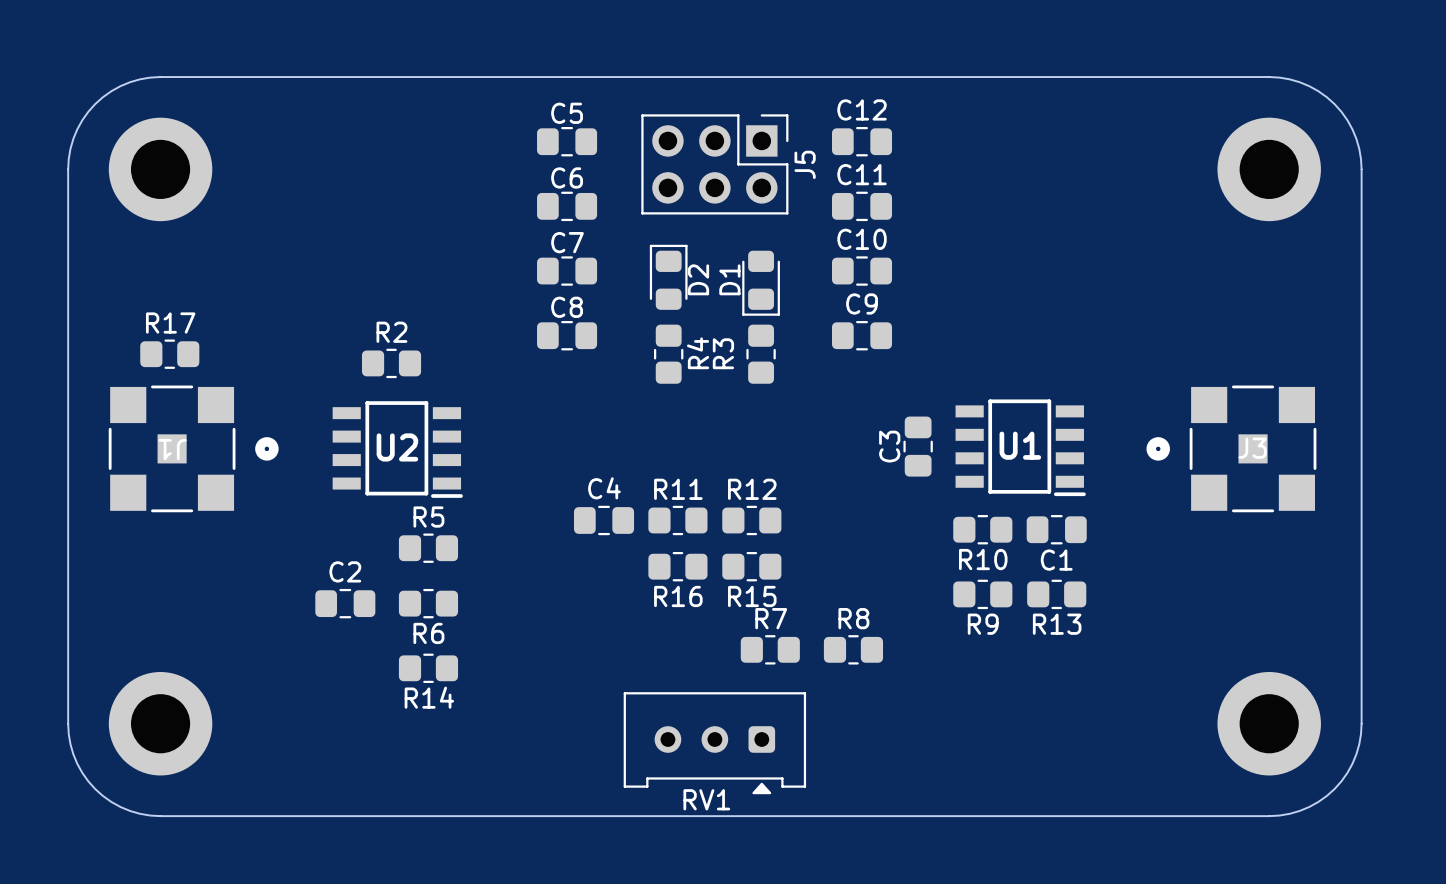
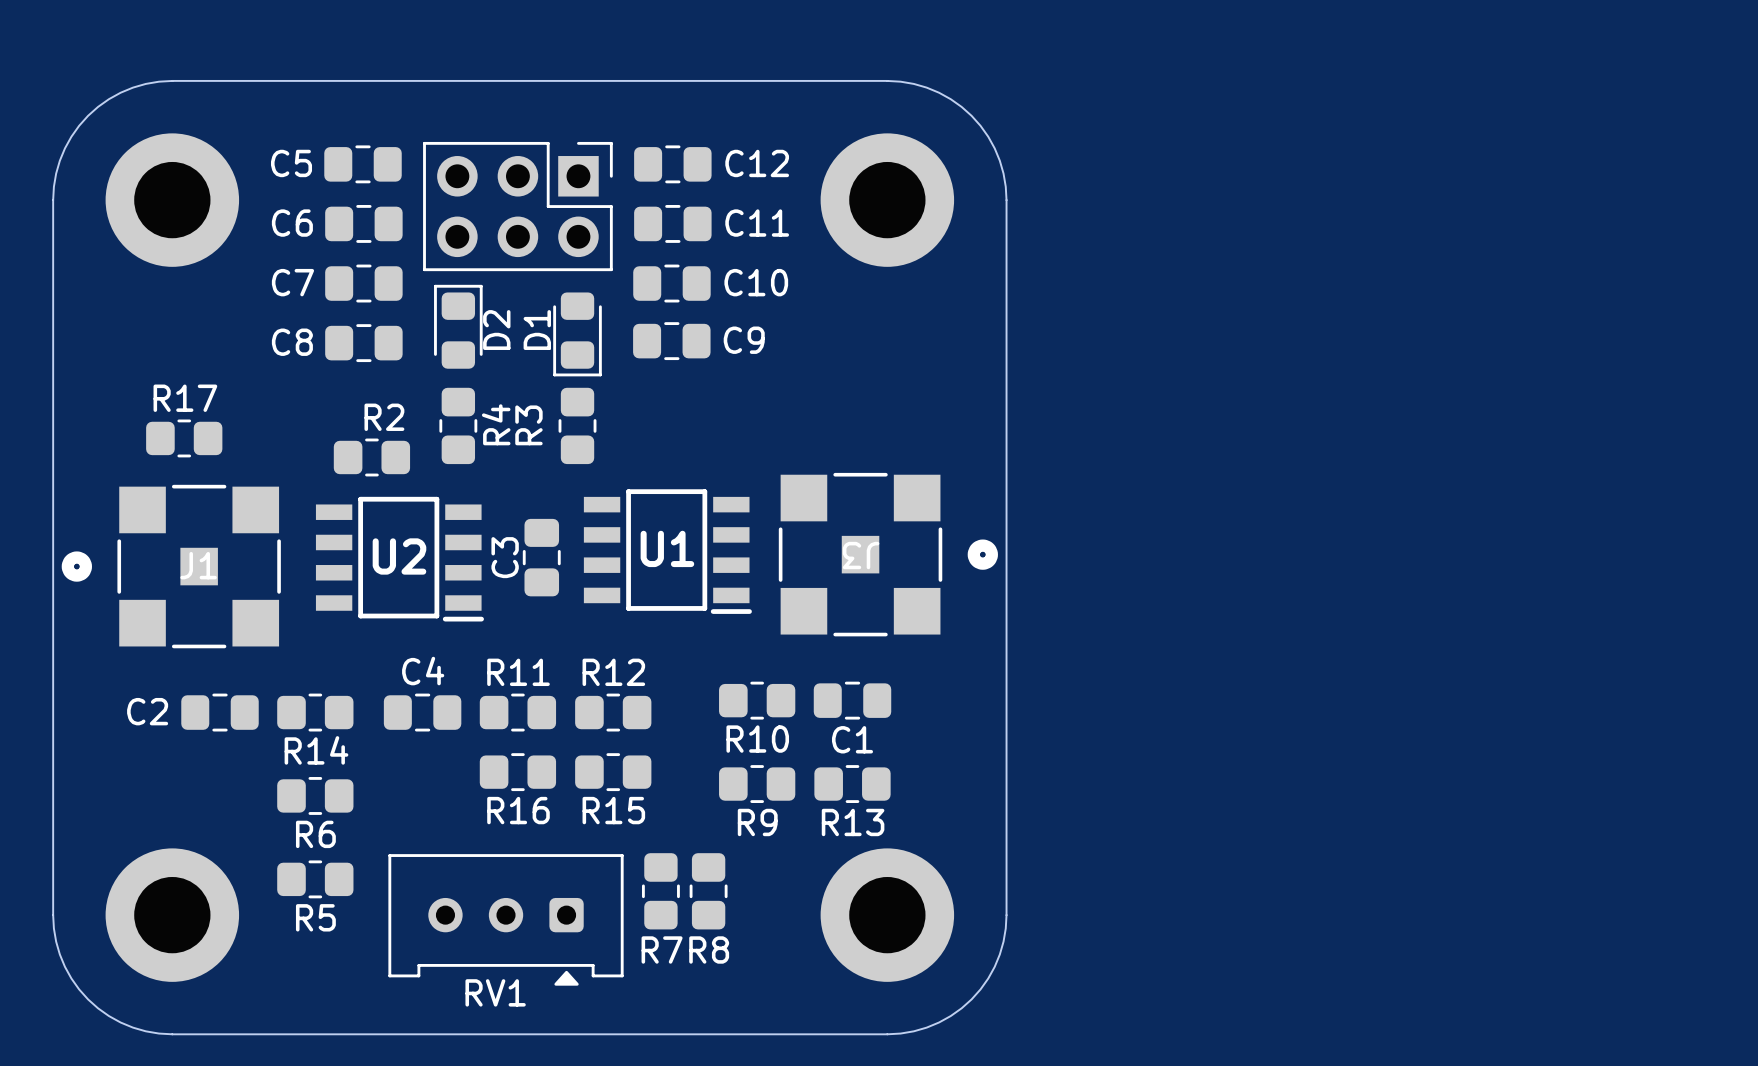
board edge: (714, 77) (1279, 77) (1309, 86) (1326, 97) (1341, 111) (1356, 138) (1361, 169) (1361, 723) (1356, 754) (1347, 772) (1334, 789) (1318, 801) (1299, 810) (1269, 816) (714, 816) -> (887, 80) (926, 87) (950, 99) (971, 115) (988, 136) (999, 160) (1006, 200) (1005, 928) (994, 966) (971, 999) (939, 1022) (913, 1031) (887, 1034)
C12 name position: C12 (862, 109) -> C12 (757, 163)
C5 name position: C5 (567, 113) -> C5 (291, 163)
C5 position: (567, 141) -> (363, 164)
C12 position: (862, 141) -> (672, 164)
J5: (714, 164) -> none
part: none -> (887, 200)
part: (1269, 169) -> none
part: none -> (517, 206)
C11 name position: C11 (862, 174) -> C11 (757, 223)
C6 name position: C6 (567, 177) -> C6 (292, 223)
C6 position: (567, 206) -> (363, 223)
C11 position: (862, 206) -> (672, 223)
C10 name position: C10 (862, 239) -> C10 (756, 282)
C7 name position: C7 (567, 242) -> C7 (292, 282)
C7 position: (567, 271) -> (363, 283)
C10 position: (862, 271) -> (671, 283)
D2 position: (668, 277) -> (458, 326)
D1 position: (761, 283) -> (577, 334)
C9 name position: C9 (862, 303) -> C9 (744, 340)
C8 name position: C8 (567, 307) -> C8 (292, 342)
R2 name position: R2 (391, 332) -> R2 (384, 417)
C8 position: (567, 335) -> (363, 343)
C9 position: (862, 335) -> (671, 341)
R4 position: (668, 354) -> (458, 425)
R3 position: (761, 354) -> (577, 425)
R2 position: (391, 363) -> (371, 457)
C3 position: (918, 446) -> (541, 557)
U1 position: (1020, 447) -> (667, 551)
part rotation: 0° (193, 448) -> 180° (171, 566)
part rotation: 0° (1231, 448) -> 180° (888, 554)
part position: (1231, 448) -> (888, 554)
U2 position: (397, 449) -> (399, 559)
R5 name position: R5 (428, 517) -> R5 (315, 917)
C4 position: (604, 520) -> (422, 712)
R11 position: (677, 520) -> (517, 712)
R12 position: (751, 520) -> (613, 712)
R10 position: (982, 529) -> (757, 700)
C1 position: (1056, 529) -> (852, 700)
R5 position: (428, 548) -> (315, 879)
R16 position: (677, 566) -> (517, 772)
R15 position: (751, 566) -> (613, 772)
C2 name position: C2 (345, 571) -> C2 (147, 711)
R9 position: (982, 594) -> (757, 784)
R13 position: (1056, 594) -> (852, 784)
C2 position: (345, 603) -> (220, 712)
R6 position: (428, 603) -> (315, 795)
R7 name position: R7 (771, 618) -> R7 (662, 949)
R8 name position: R8 (853, 618) -> R8 (709, 949)
R7 rotation: 0° (770, 649) -> 90° clockwise (660, 891)
R7 position: (770, 649) -> (660, 891)
R8 rotation: 0° (853, 649) -> 90° clockwise (708, 891)
R8 position: (853, 649) -> (708, 891)
R14 position: (428, 668) -> (315, 712)
part: none -> (887, 915)
part: (1269, 723) -> none
RV1 position: (714, 743) -> (506, 919)

